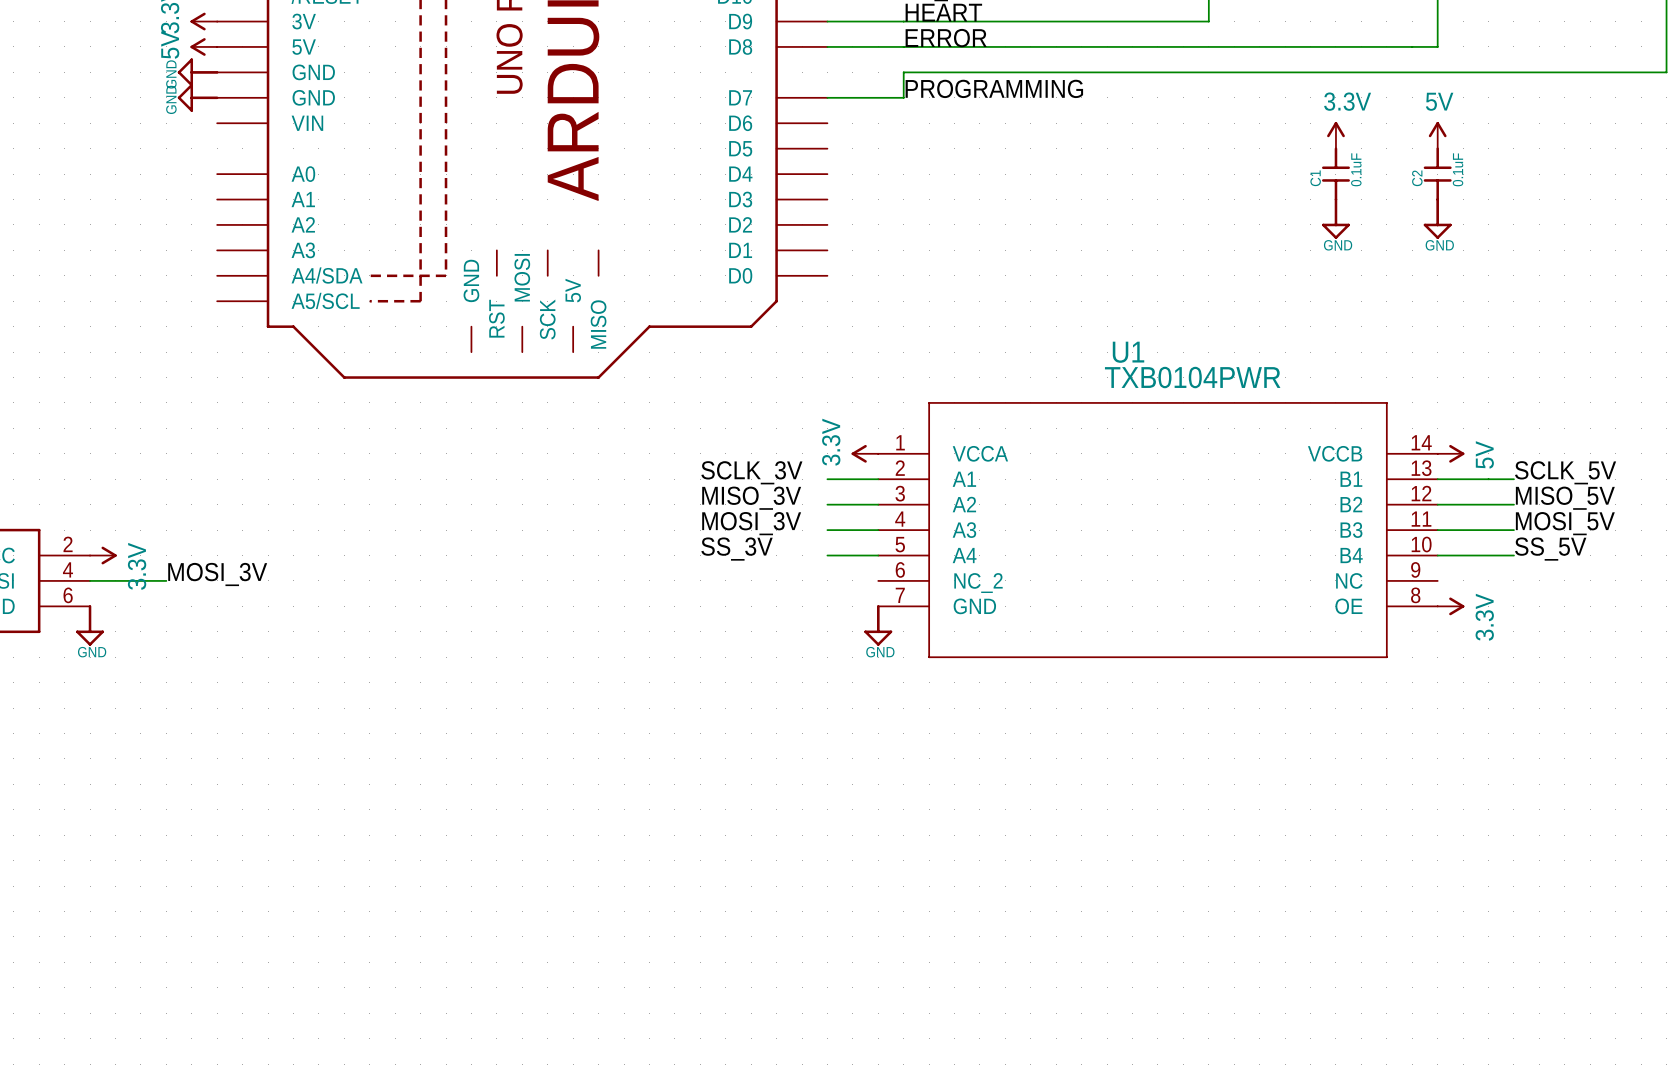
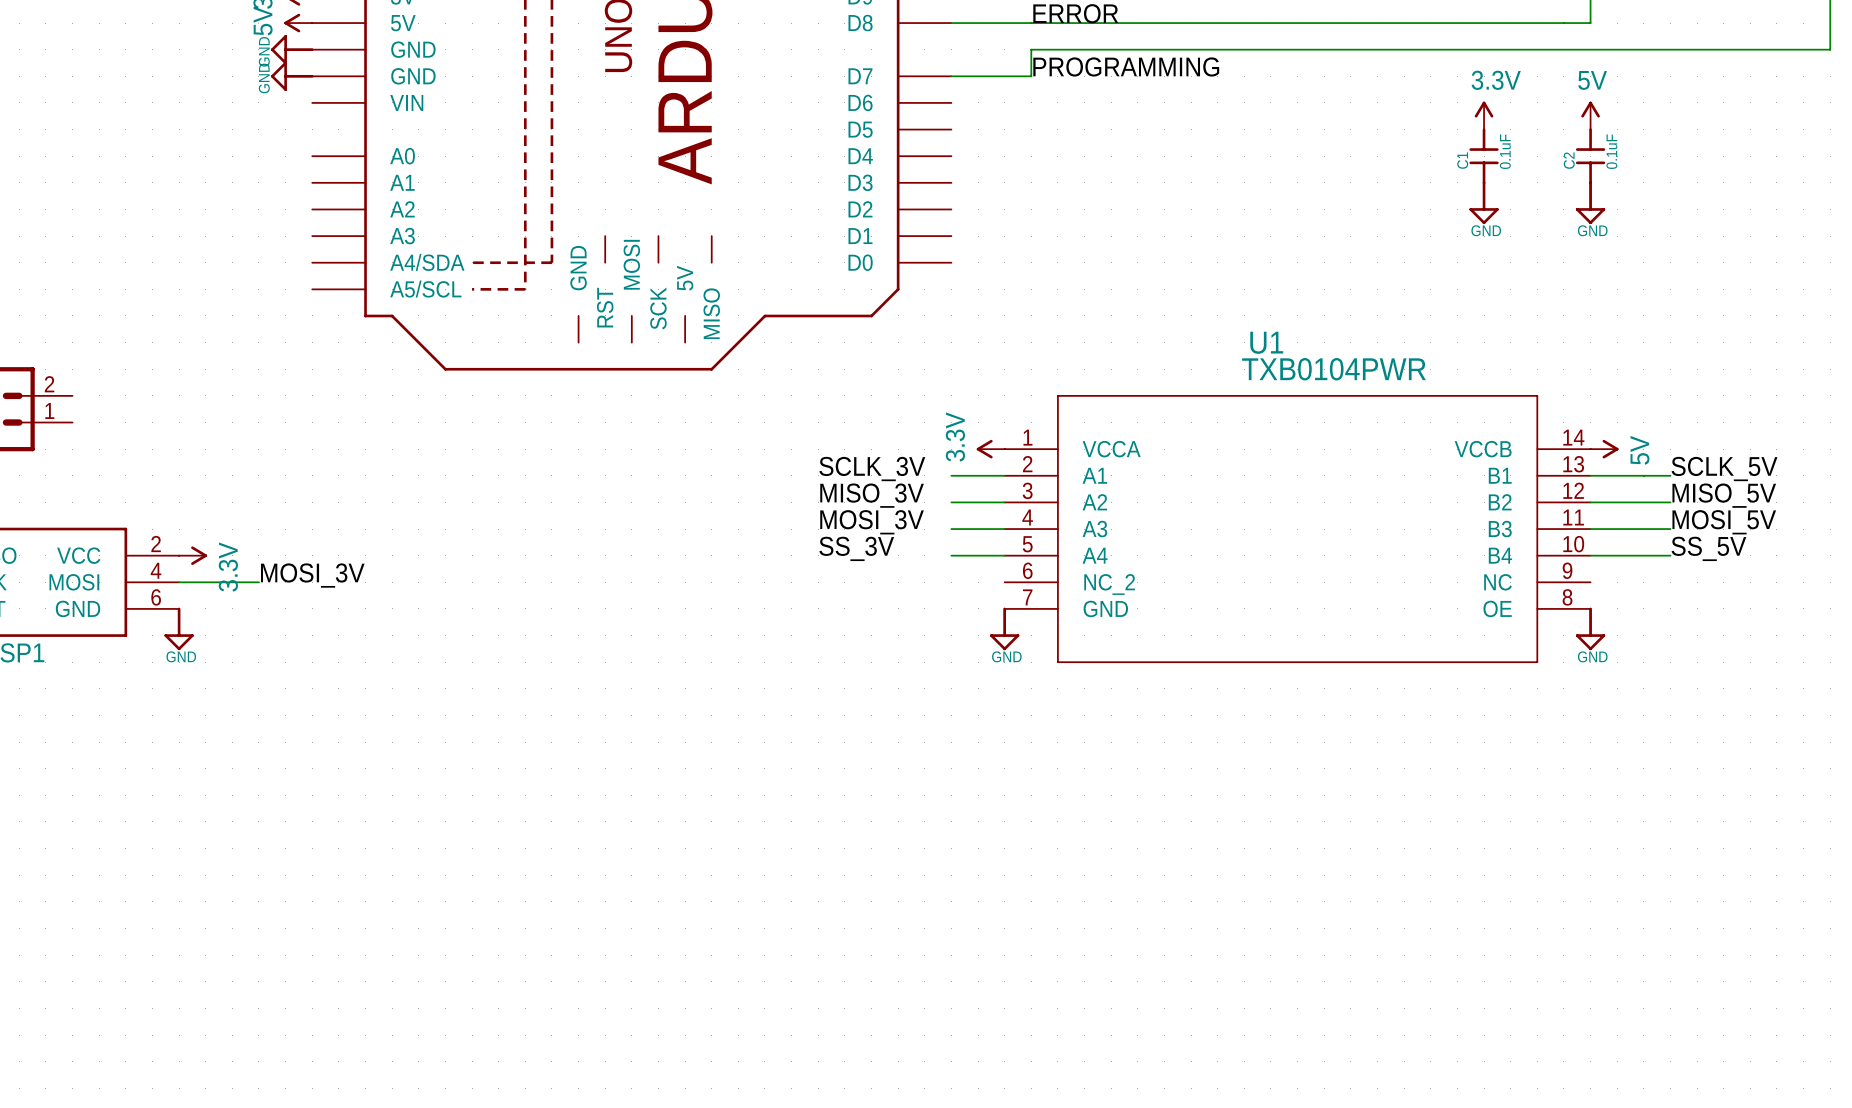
power symbol: 3.3V (1451, 606) -> none
power symbol: none -> GND (1590, 628)

